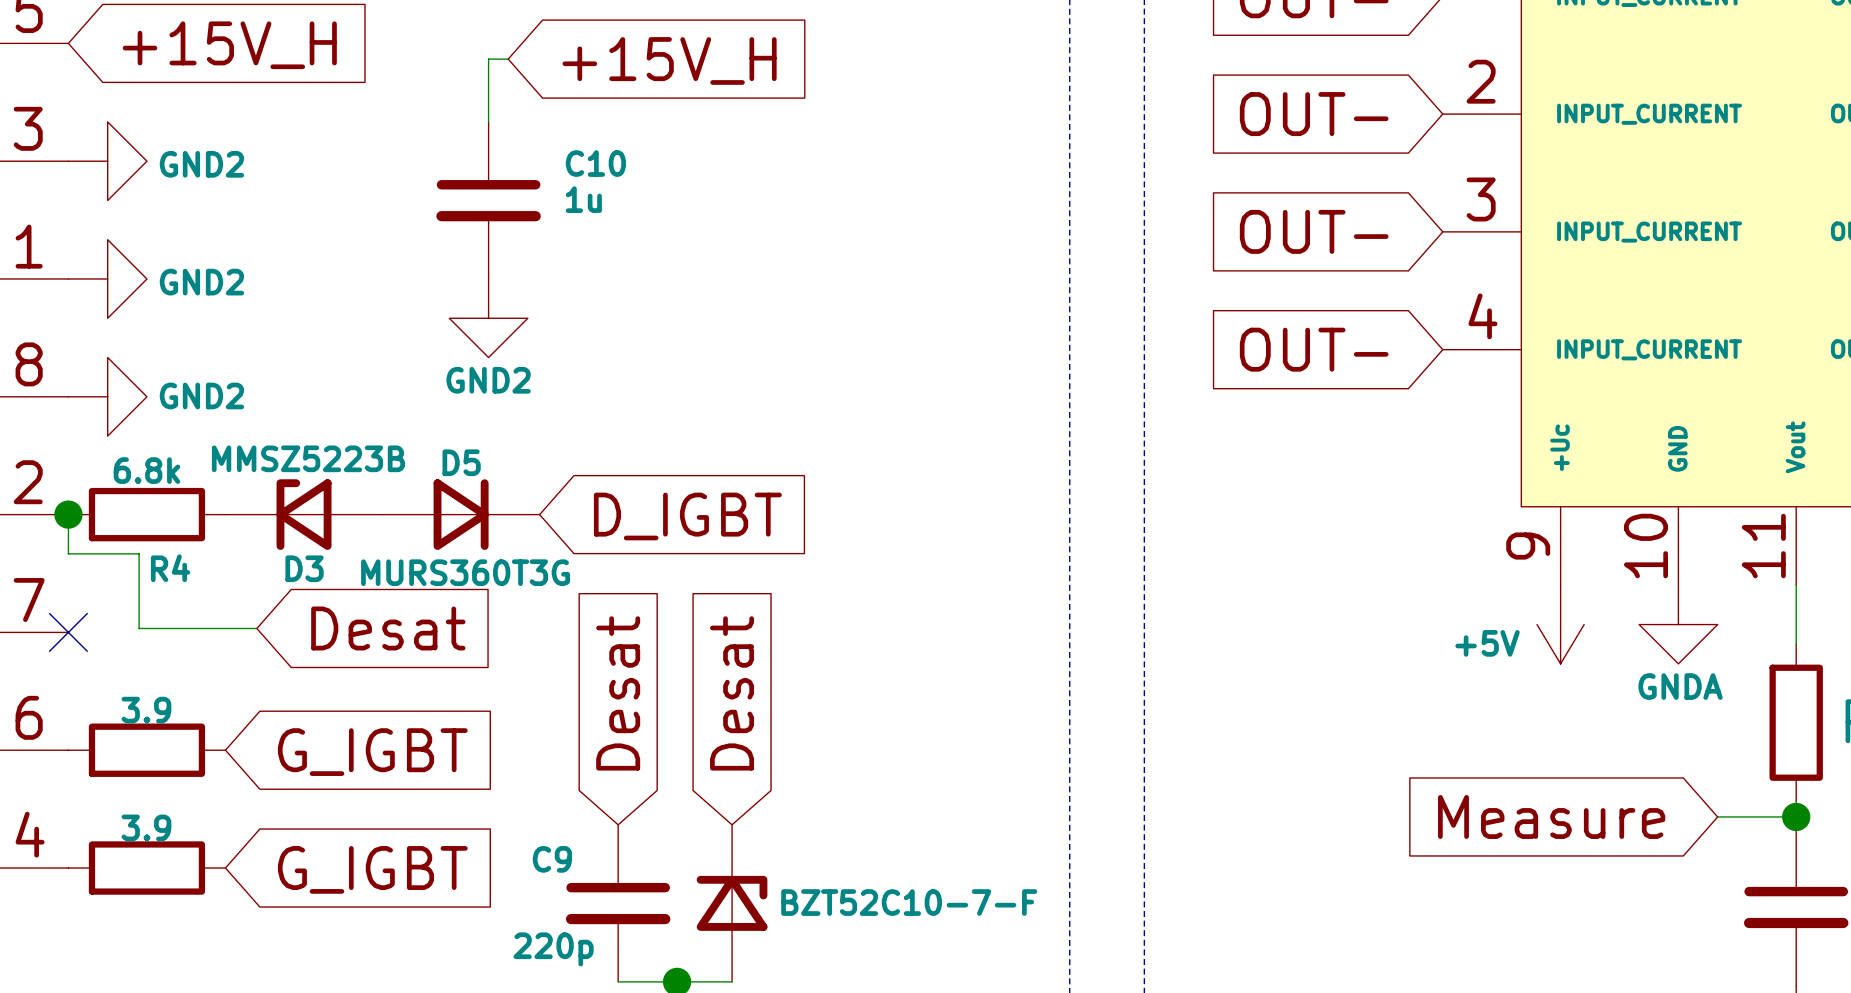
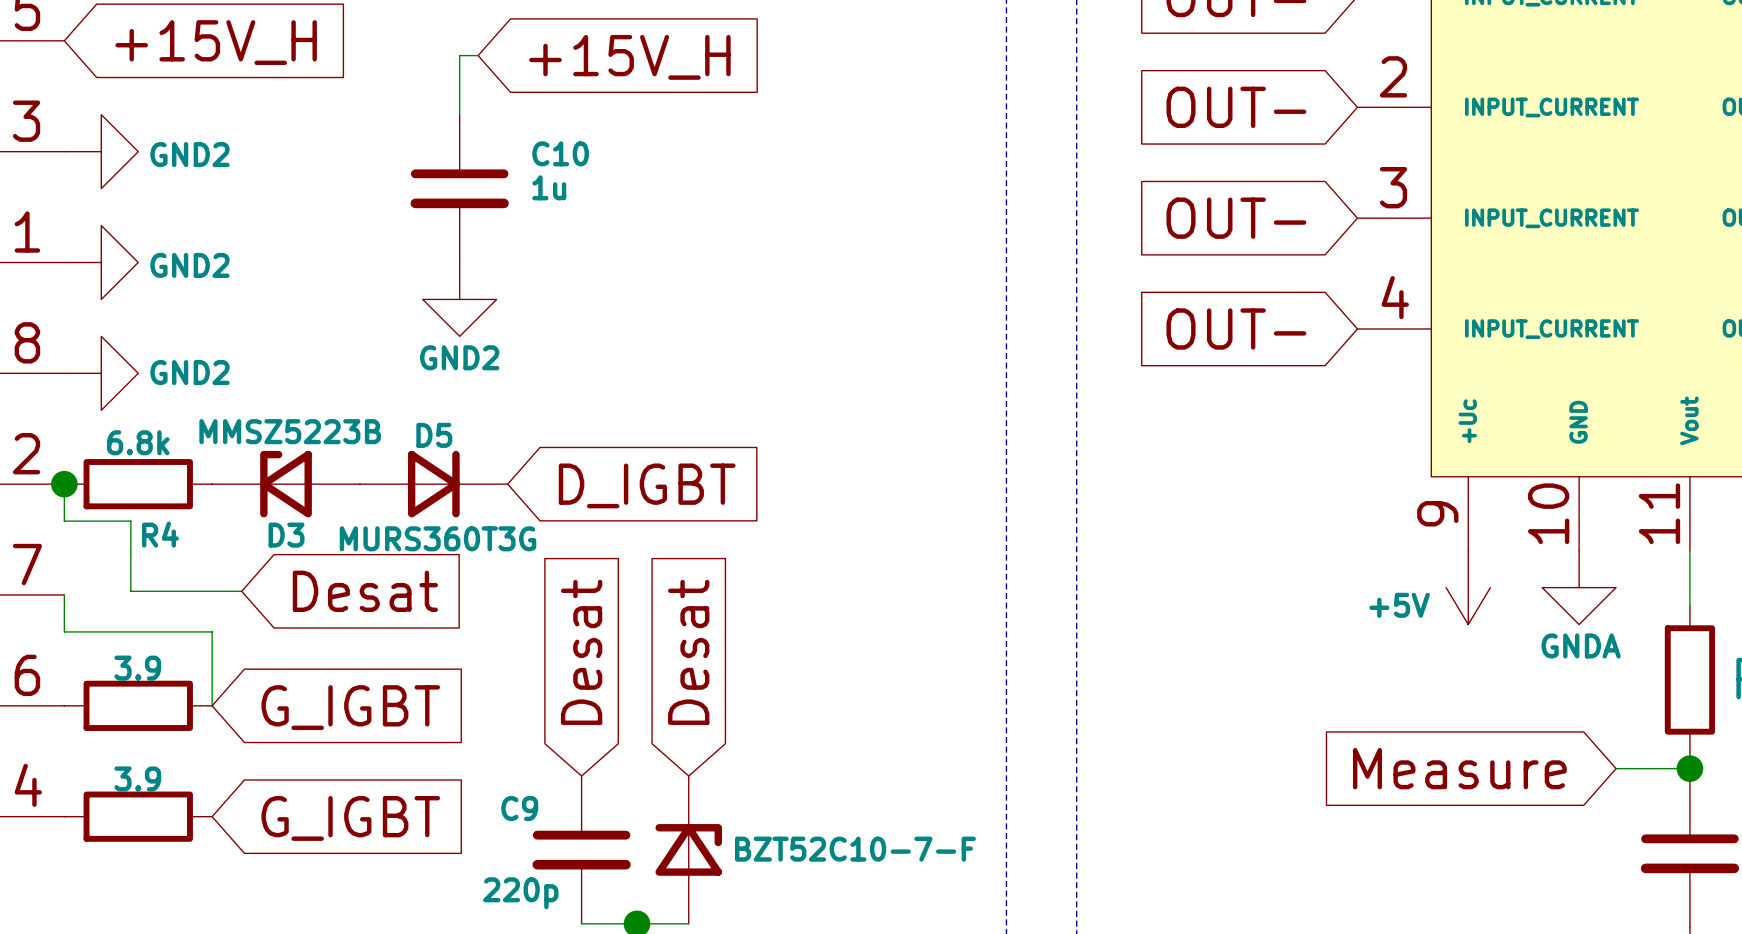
wire: none -> (64, 595) (64, 631) (212, 631) (212, 705)
no-connect mark: (68, 632) -> none

